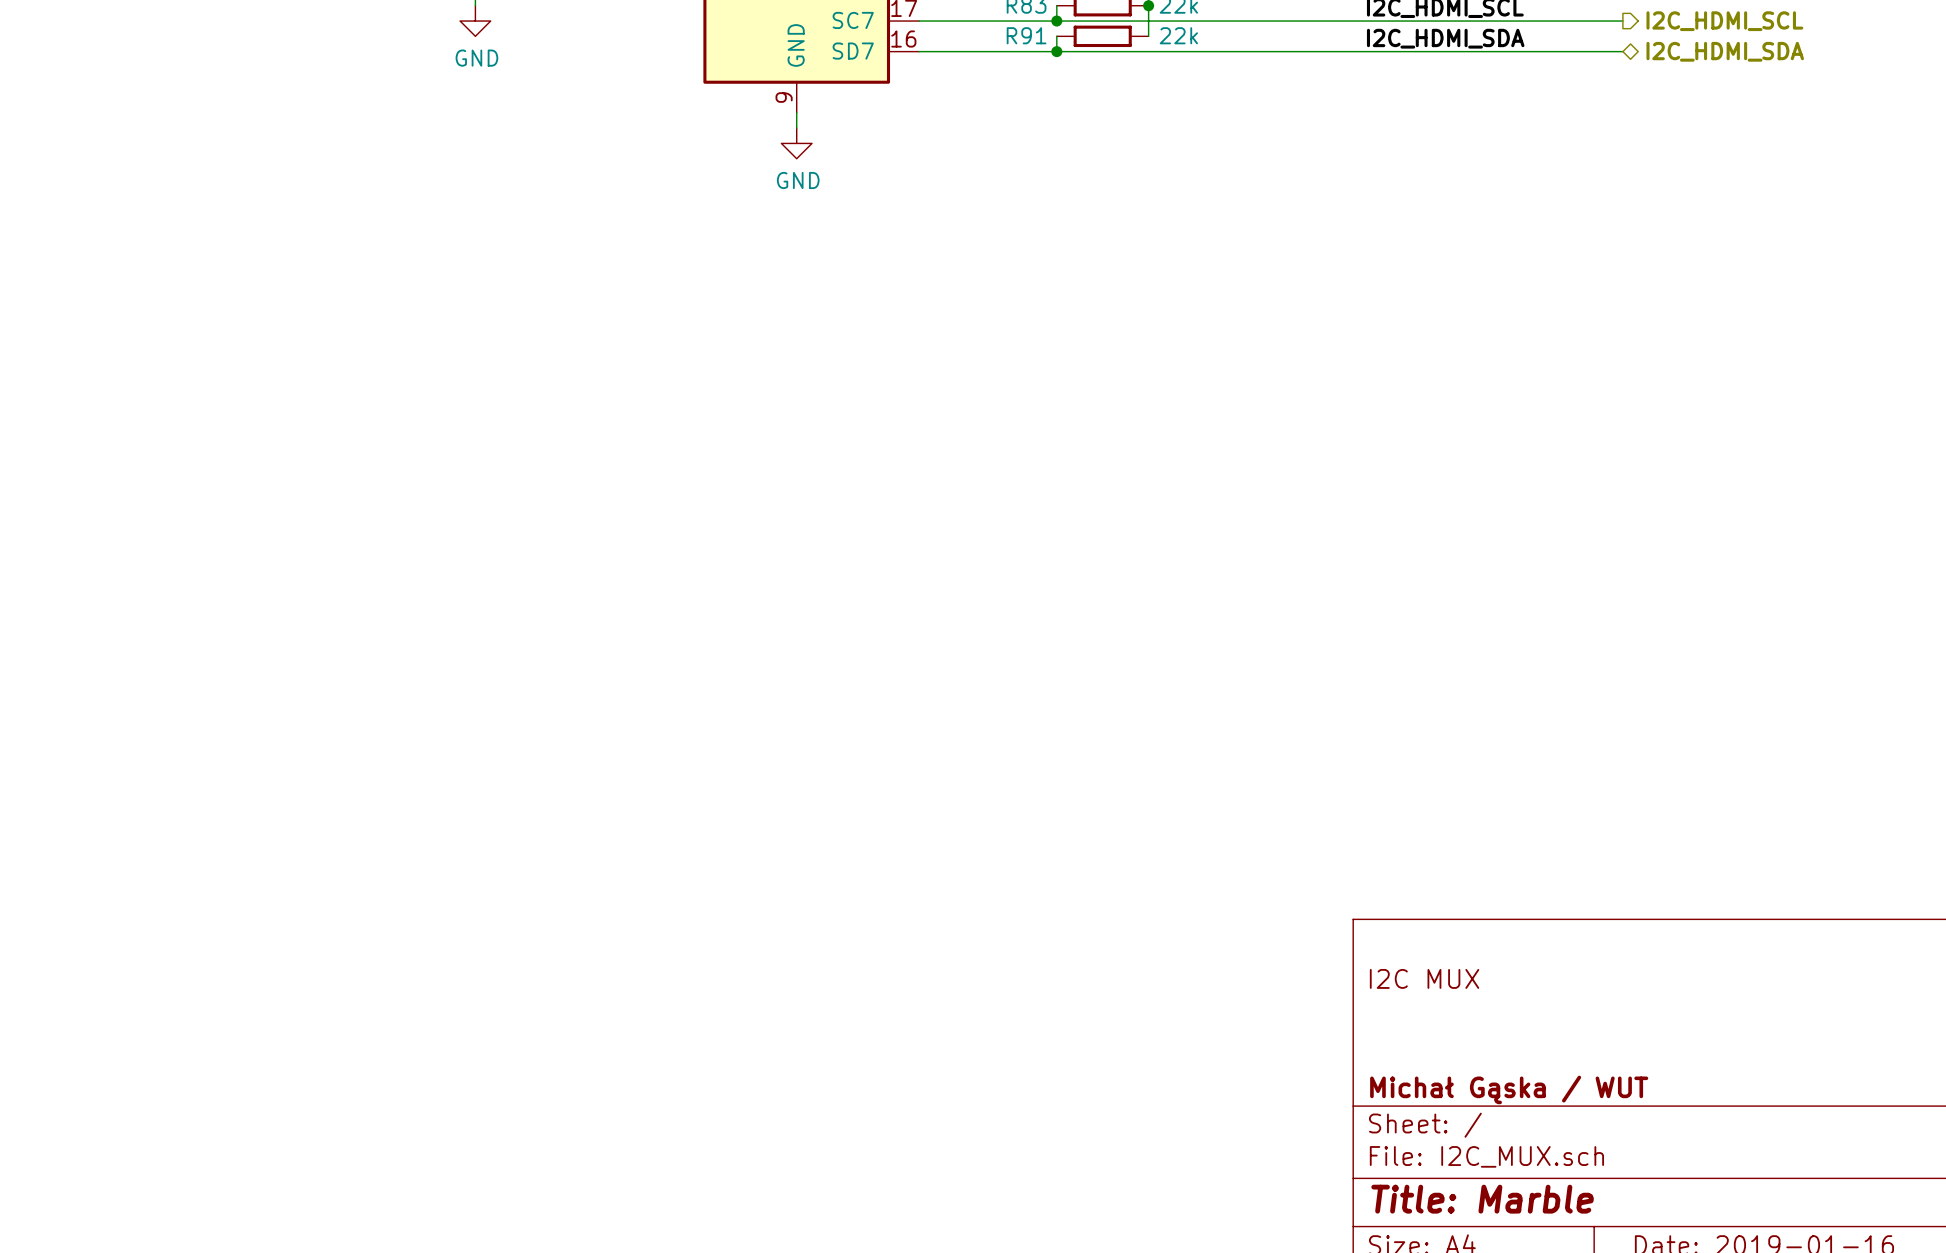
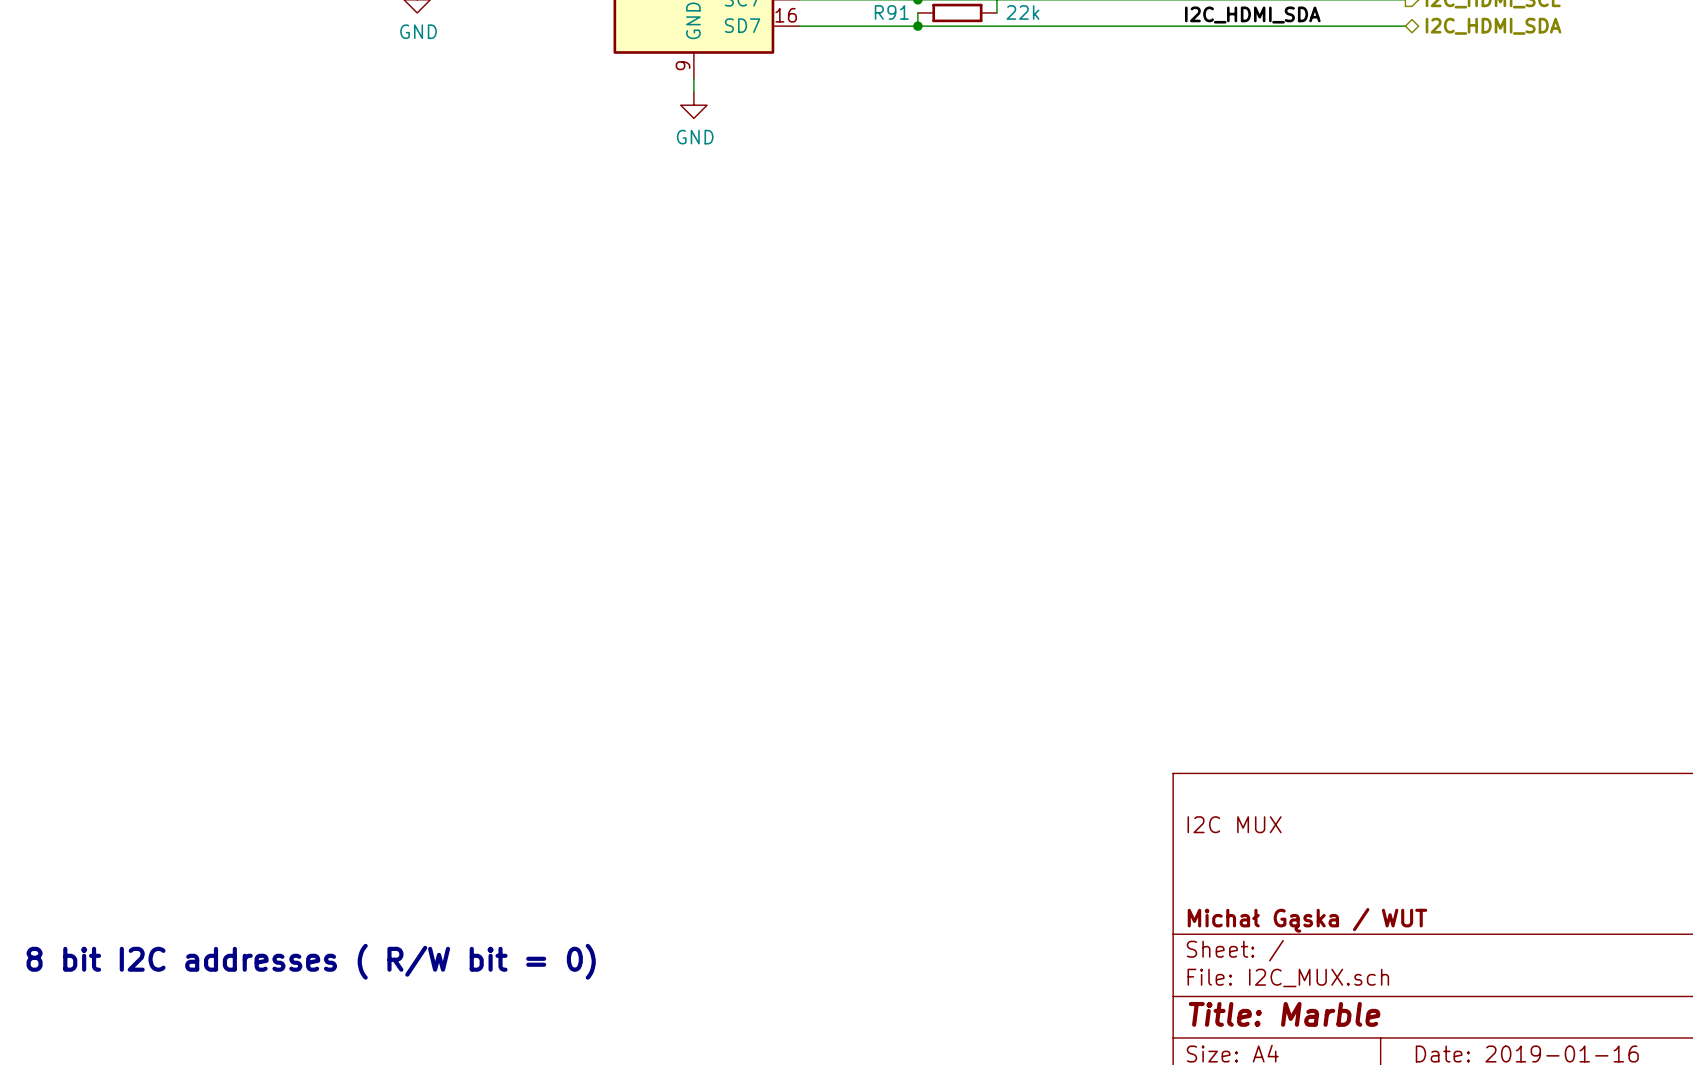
text: none -> 8 bit I2C addresses ( R/W bit = 0) (311, 961)

